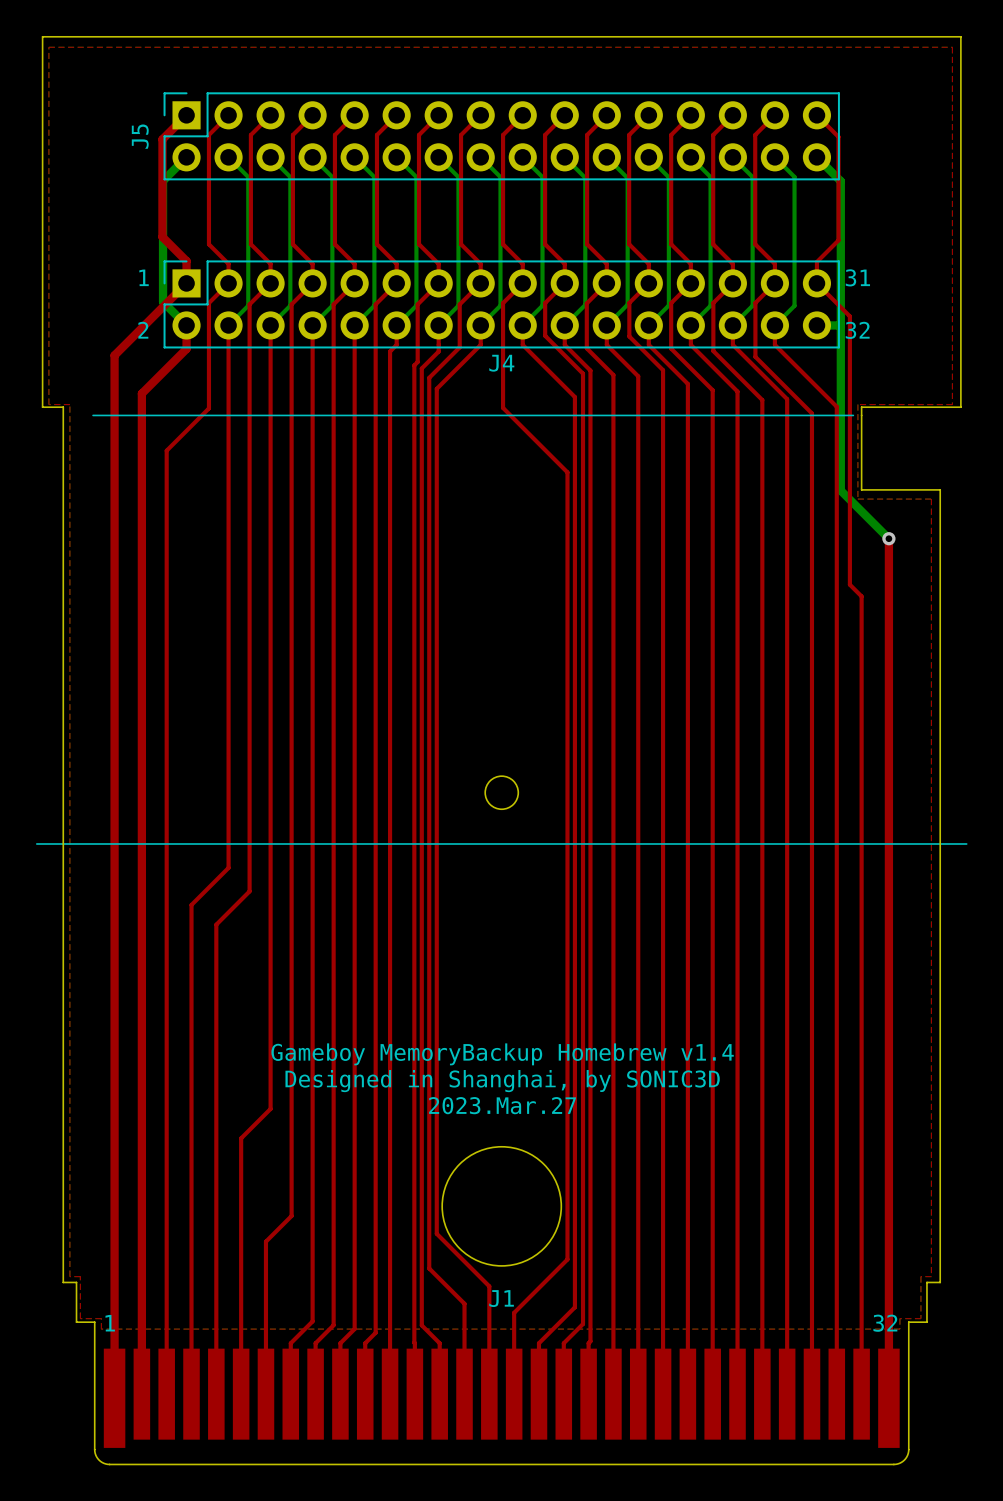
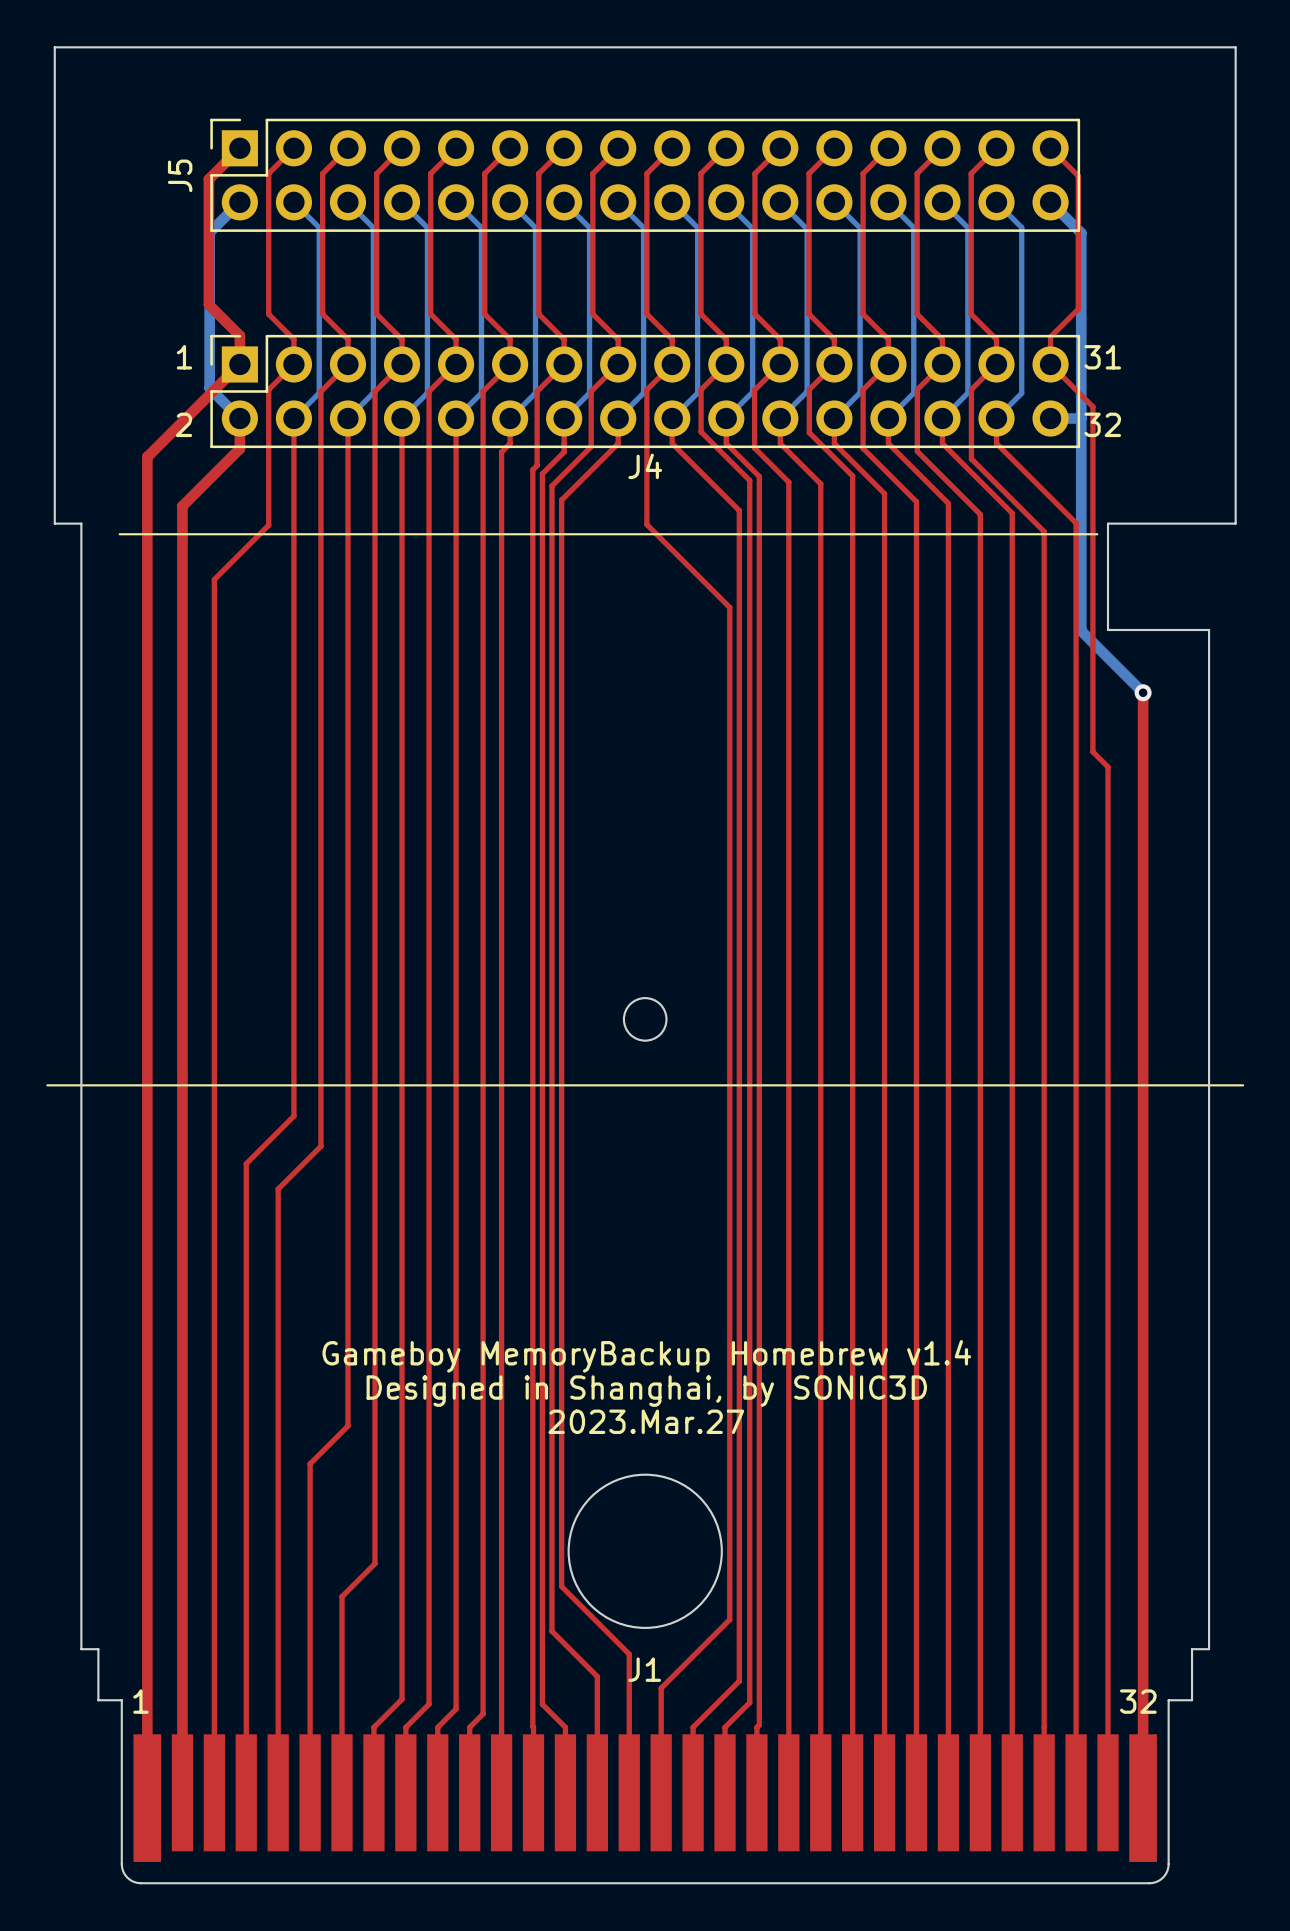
top zone outline: (48, 47) (48, 404) (69, 404) (69, 1276) (80, 1276) (80, 1318) (101, 1318) (101, 1329) (899, 1329) (899, 1318) (920, 1318) (920, 1276) (931, 1276) (931, 499) (857, 499) (857, 404) (952, 404) (952, 47) (48, 47) -> none

